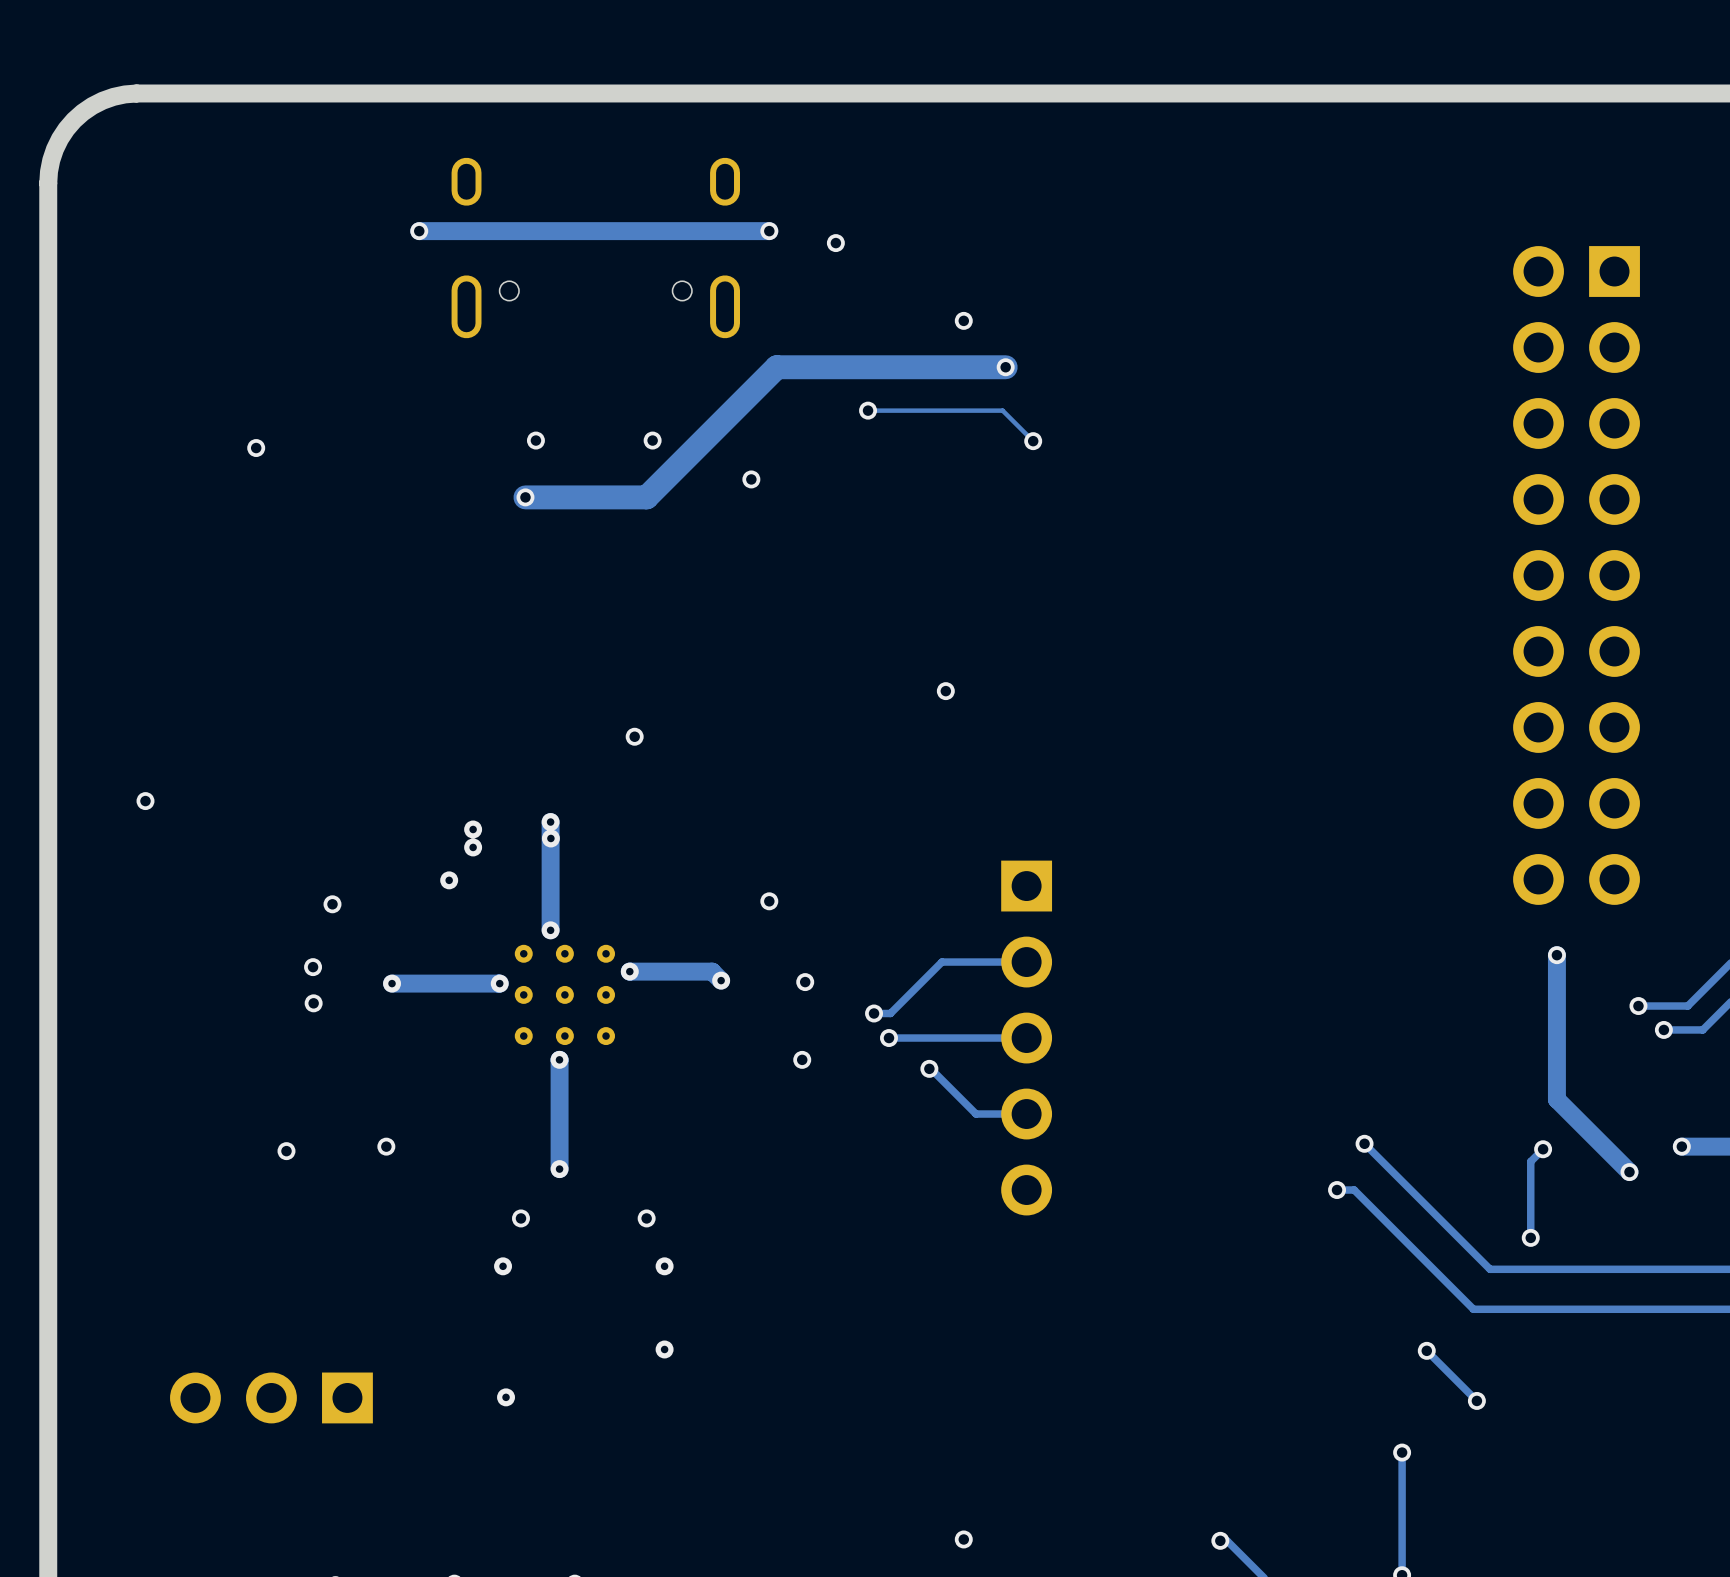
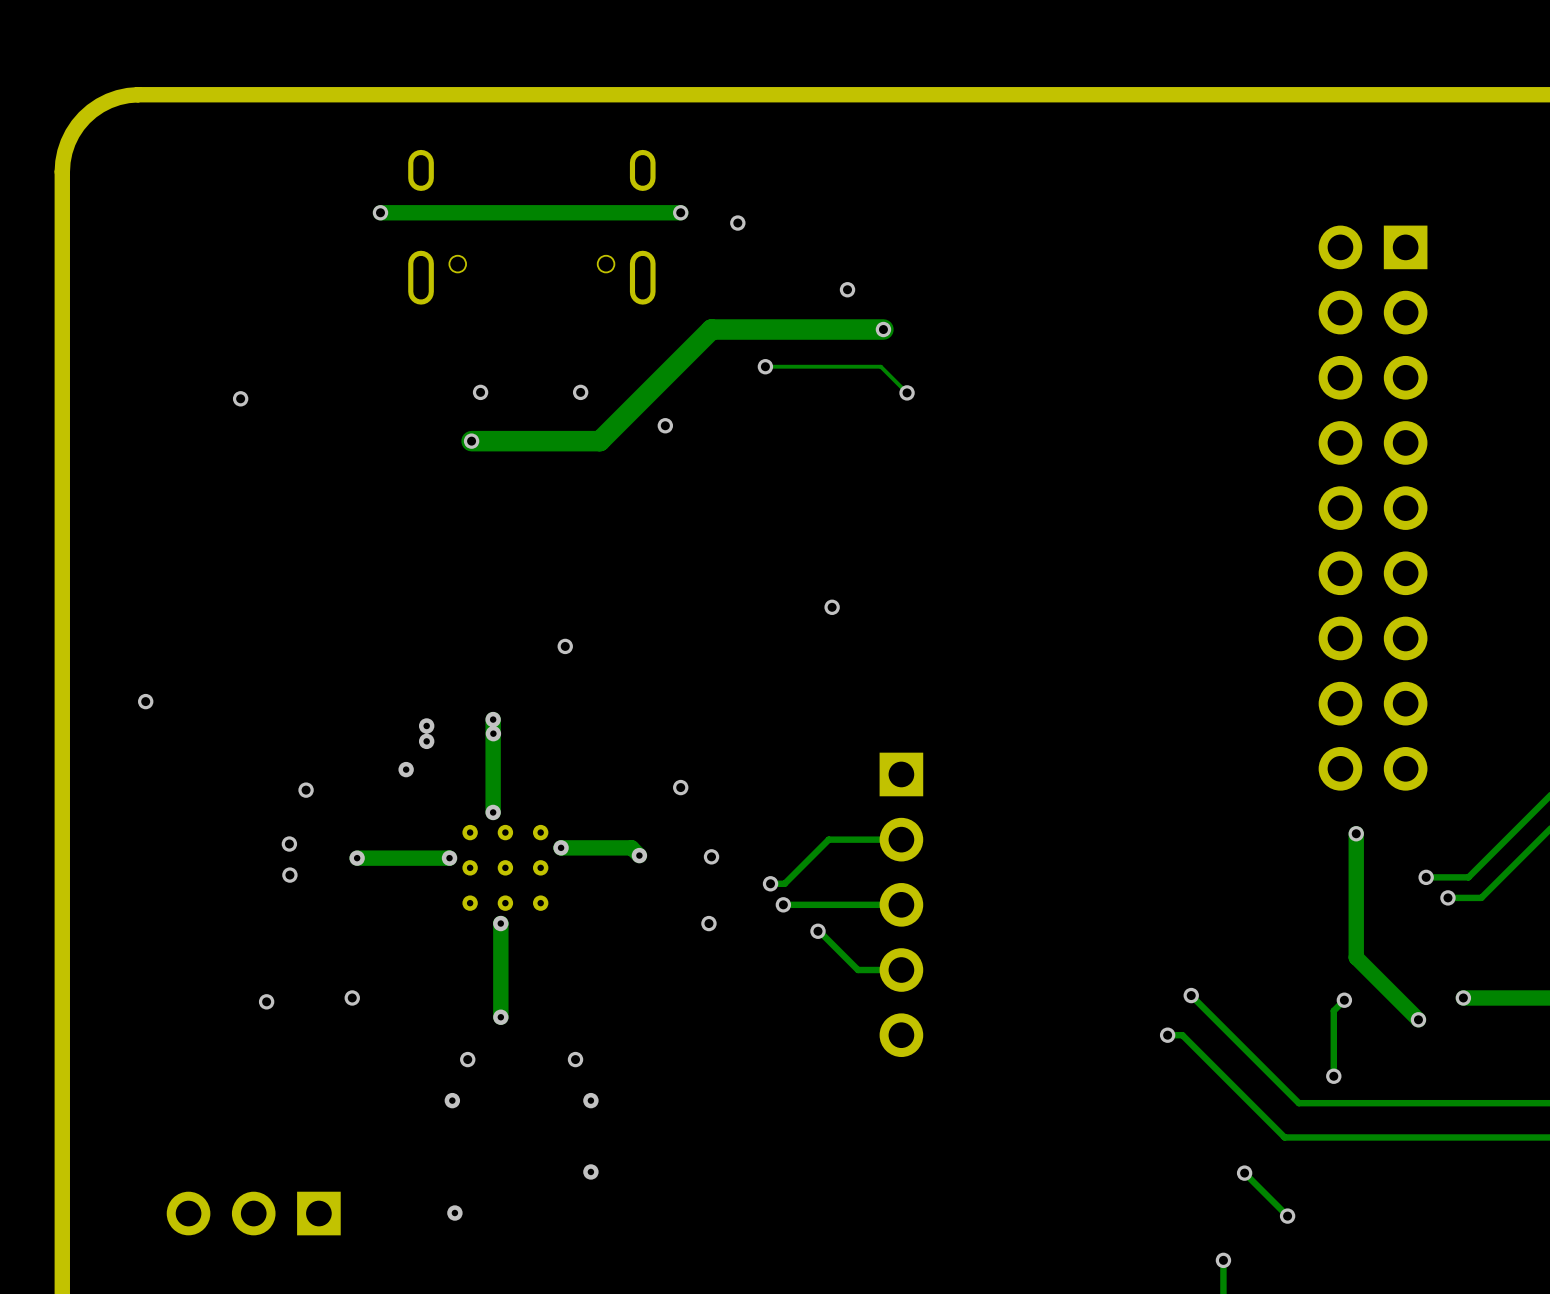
track: (805, 367) (776, 367) (646, 497) -> (711, 329) (599, 441) (575, 441)

